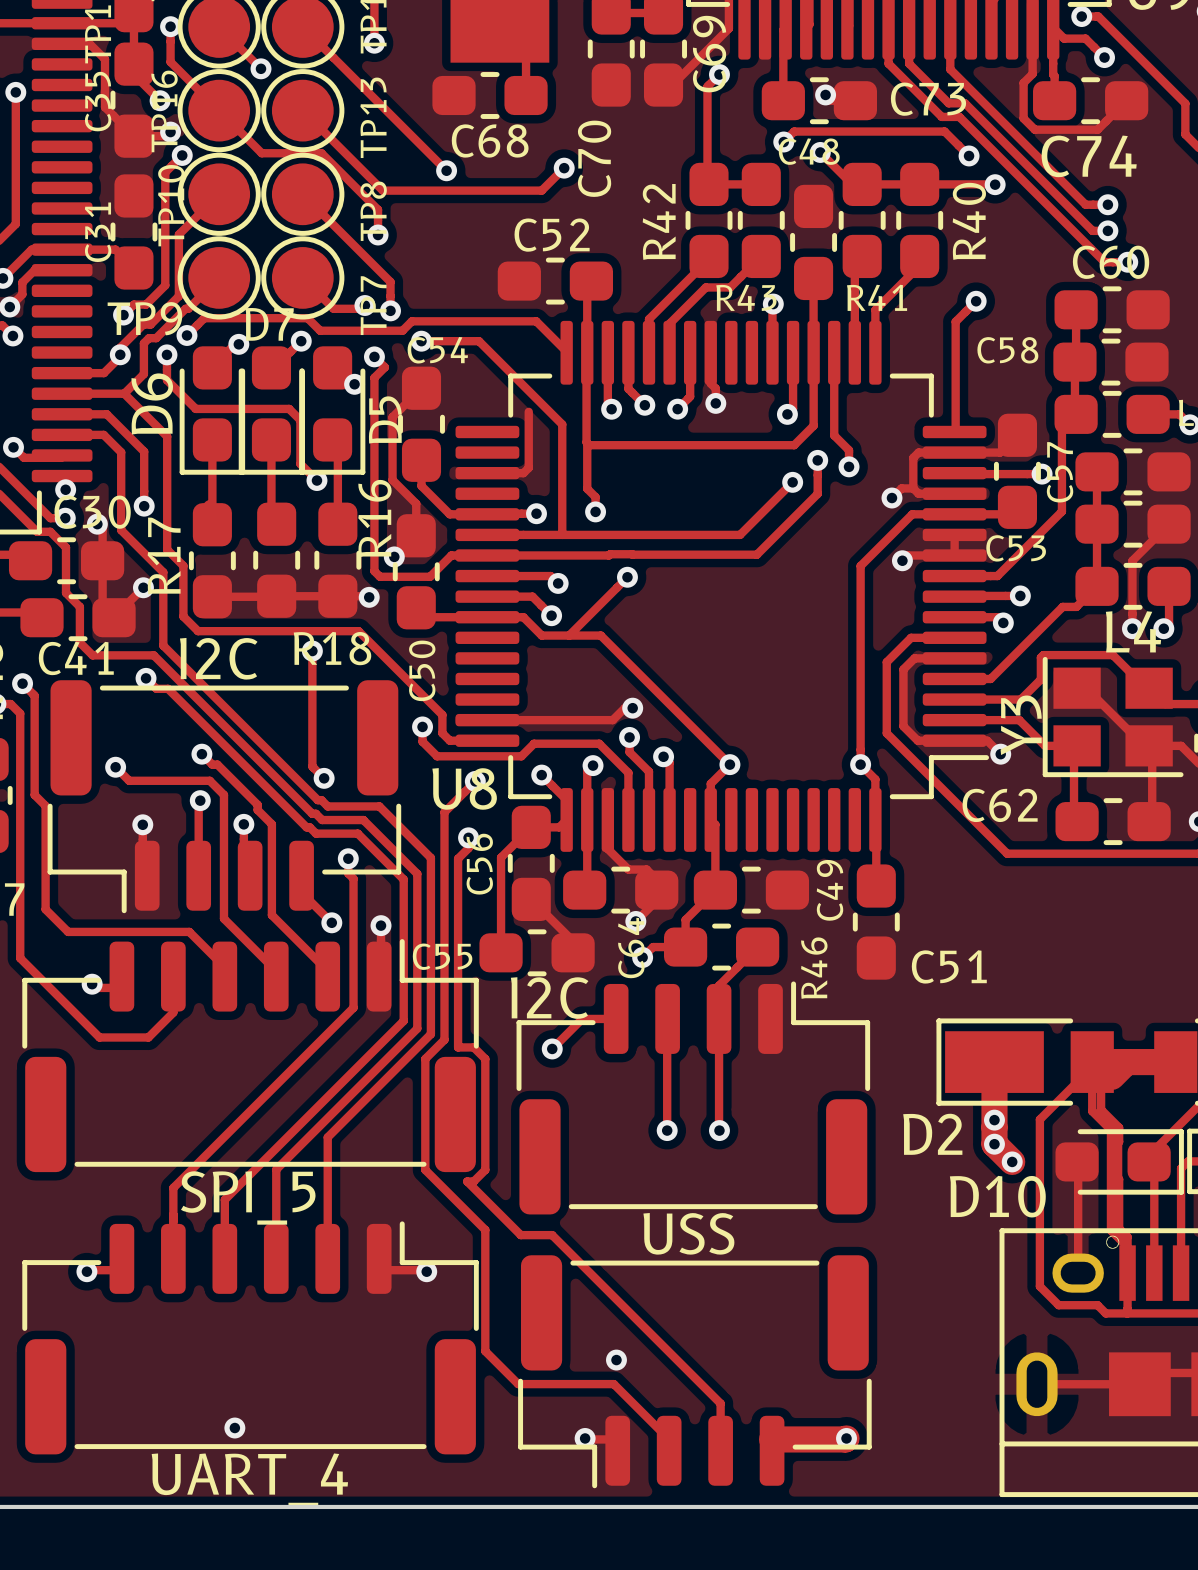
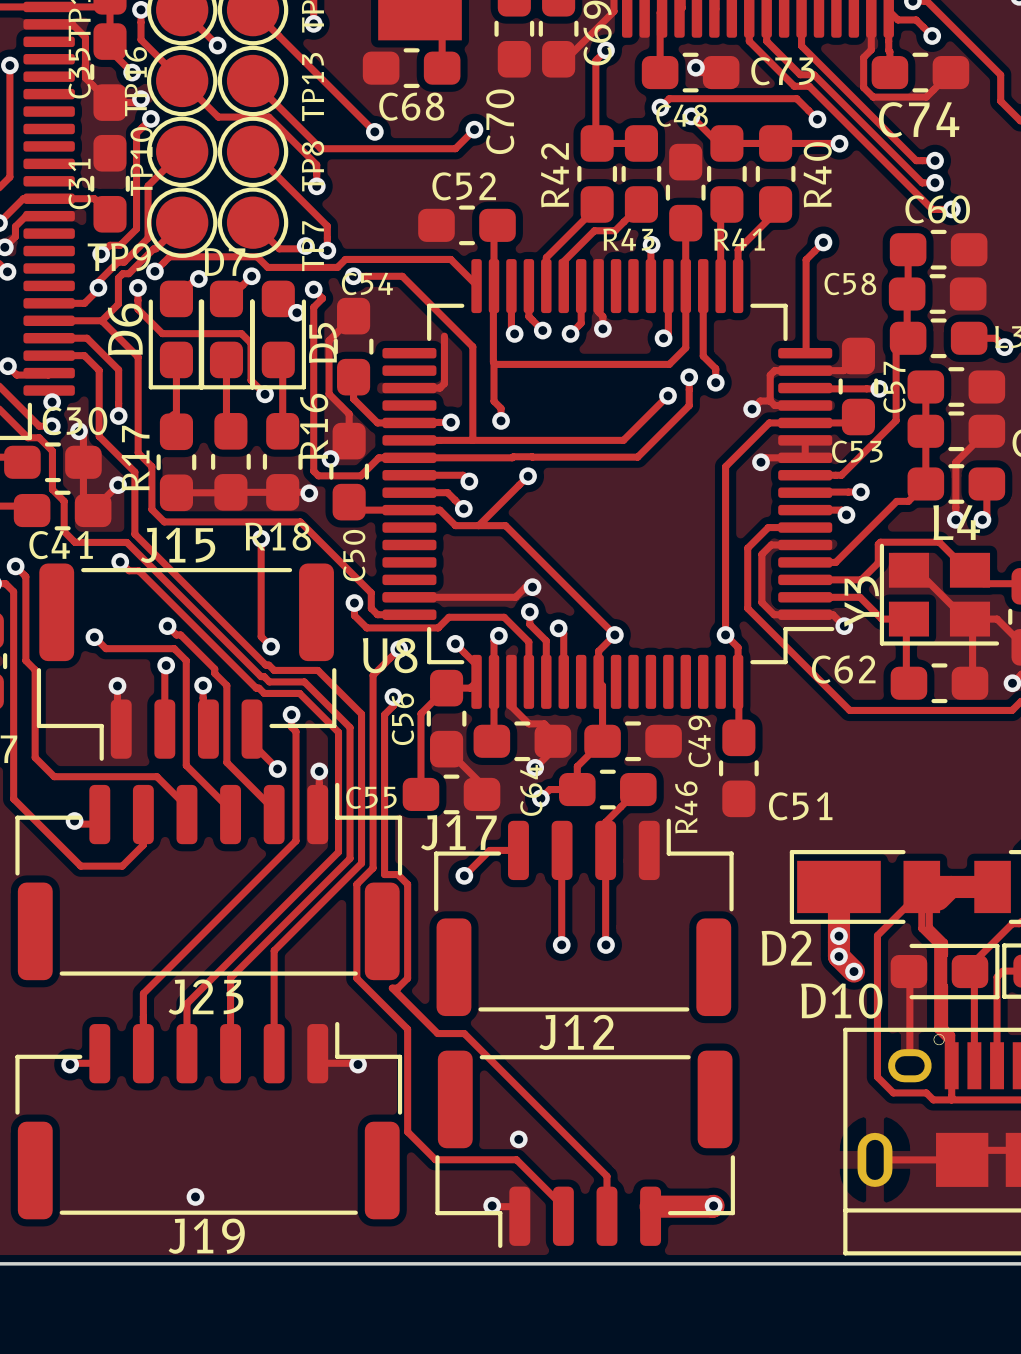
I2C name: I2C (218, 658) -> J15 (177, 545)
I2C name: I2C (549, 998) -> J17 (458, 832)
SPI_5 name: SPI_5 (248, 1197) -> J23 (205, 997)
USS name: USS (688, 1233) -> J12 (576, 1032)
UART_4 name: UART_4 (249, 1480) -> J19 (206, 1236)

